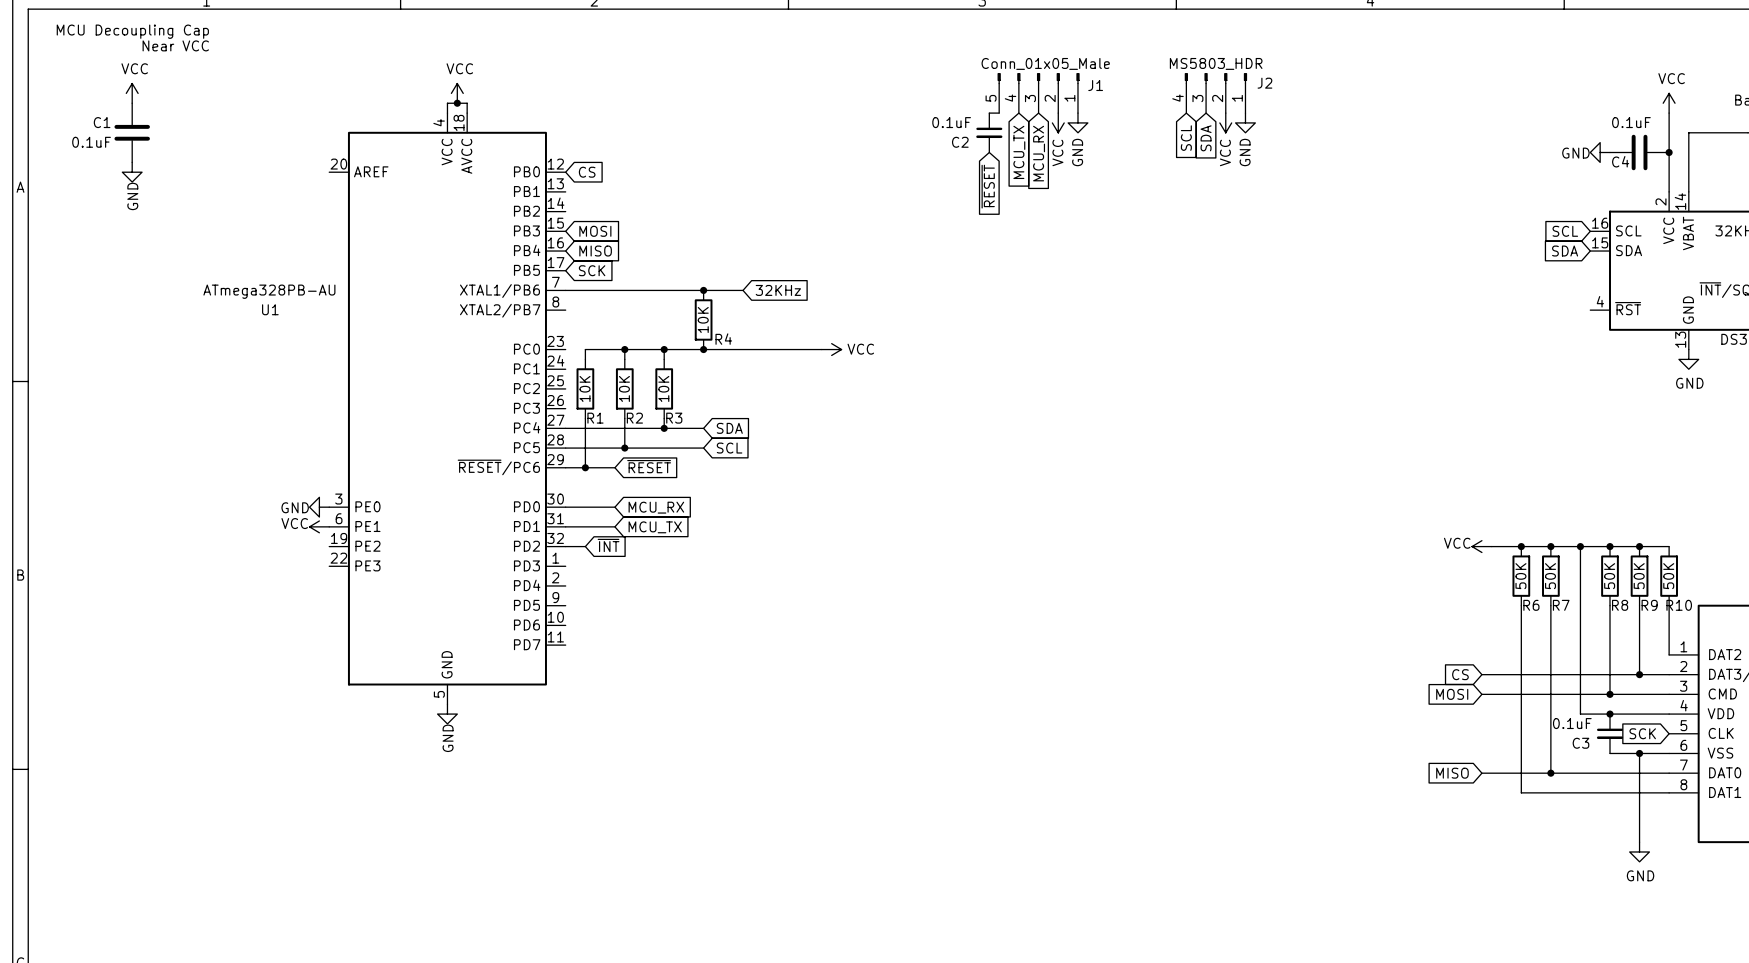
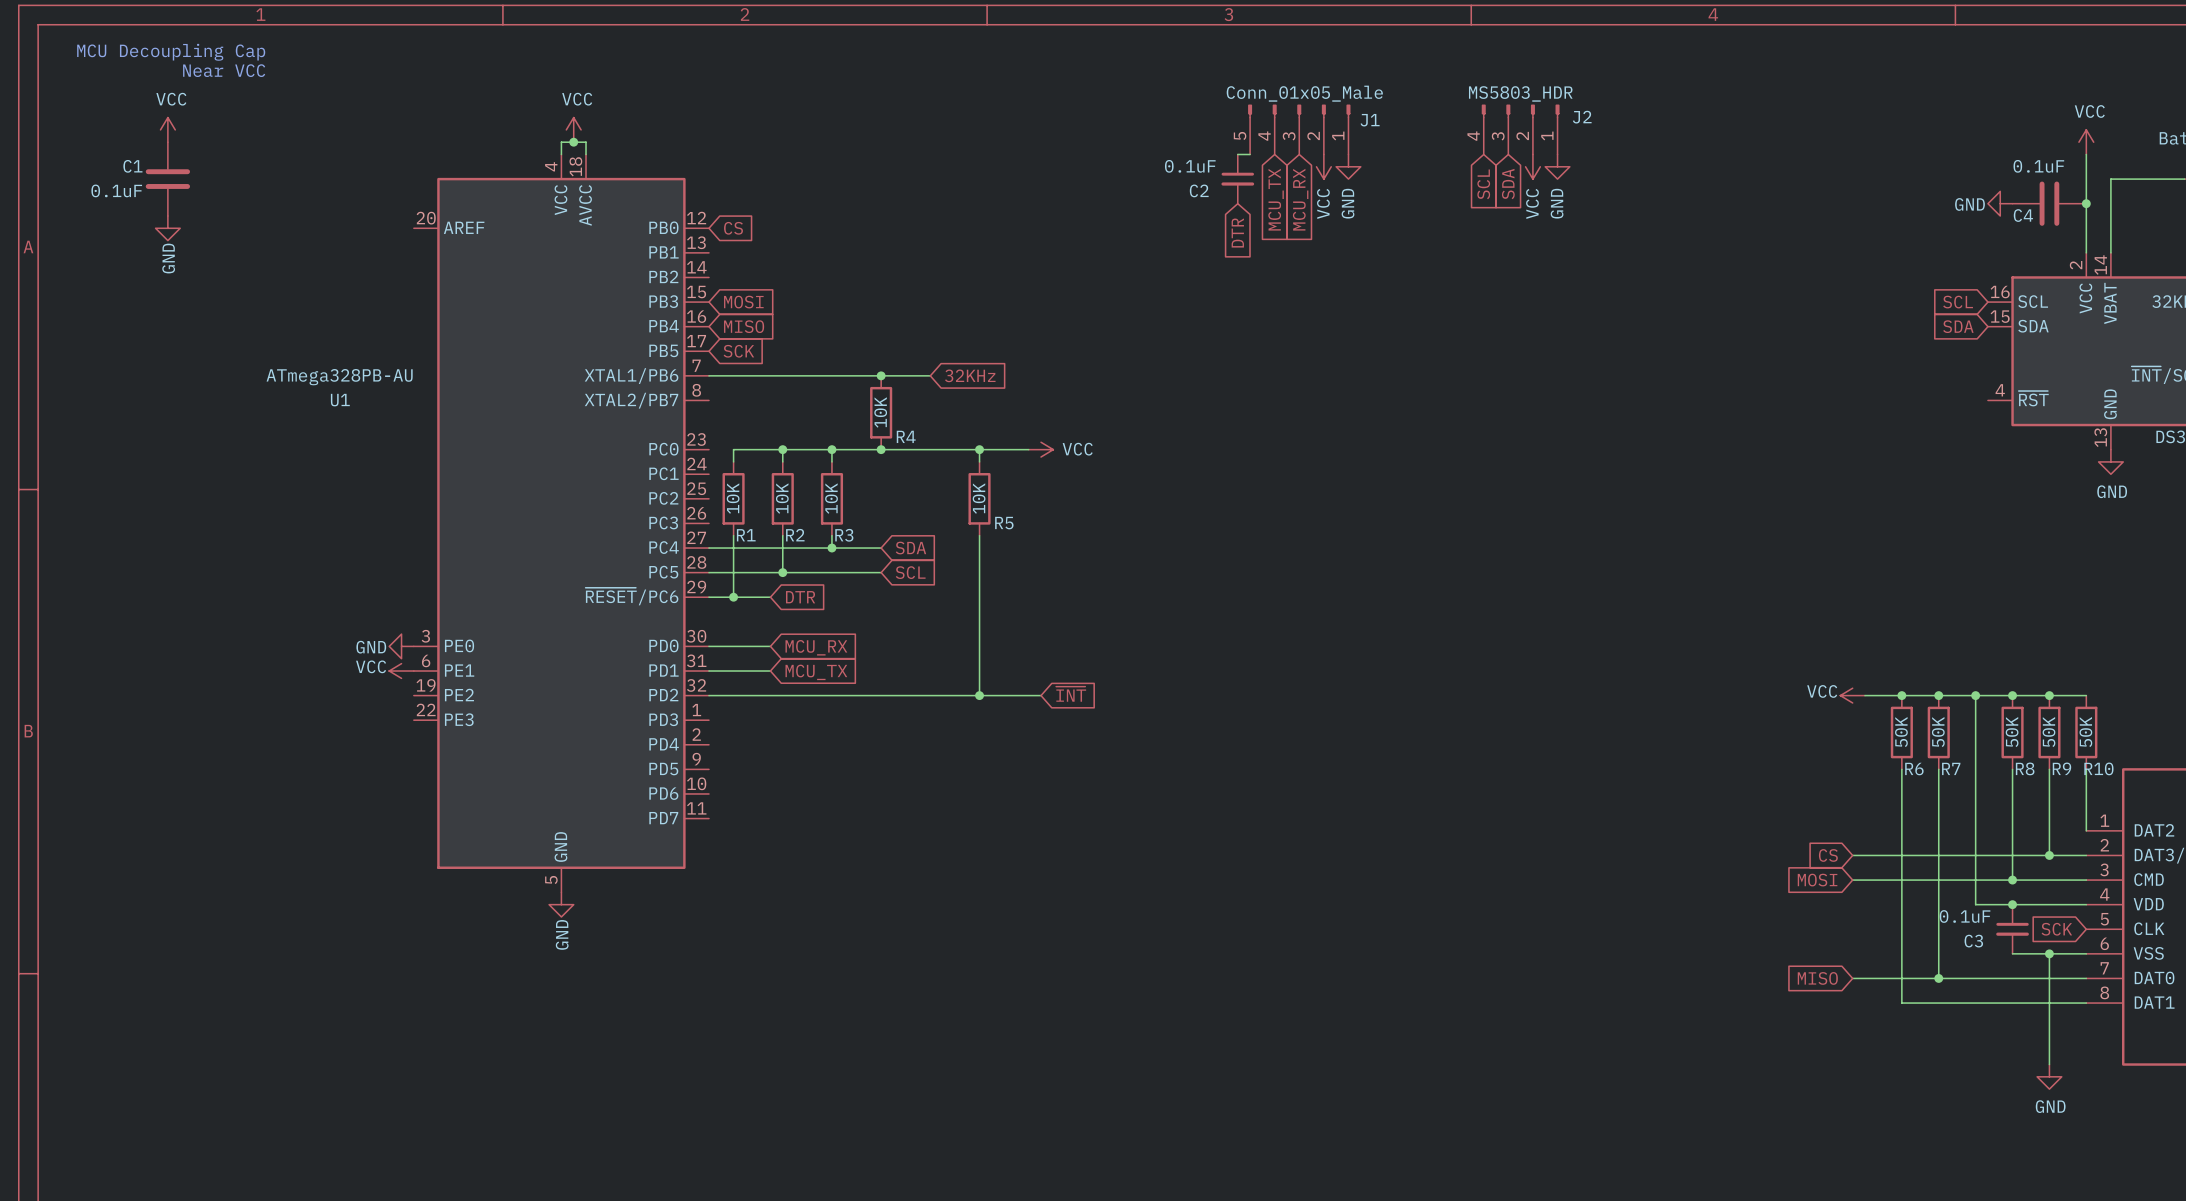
global label: ~{RESET} (988, 186) -> DTR (1237, 232)
wire: none -> (979, 449) (979, 461)
junction: none -> (979, 449)
R5: none -> 10K (979, 498)
wire: none -> (979, 535) (979, 695)
global label: ~{RESET} (649, 466) -> DTR (800, 597)
global label: ~{INT} (608, 545) -> none
global label: none -> ~{INT} (1071, 694)
wire: none -> (733, 695) (1041, 695)
junction: none -> (979, 695)

